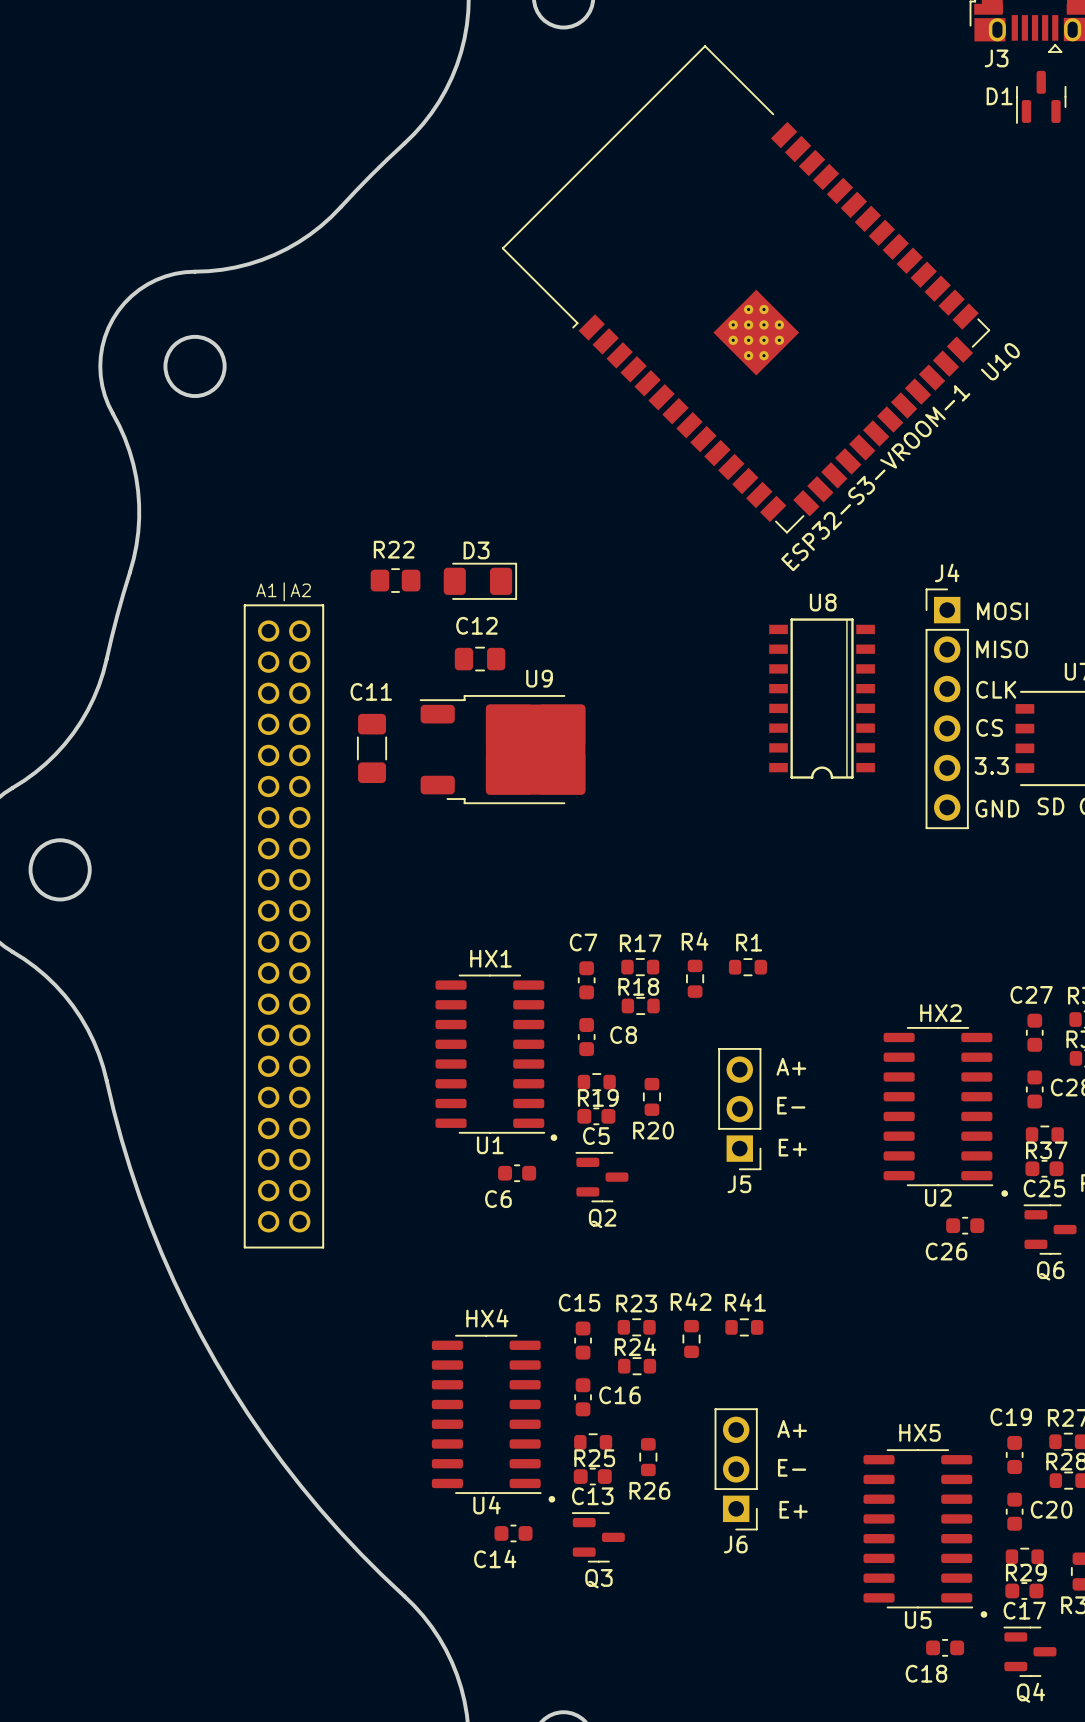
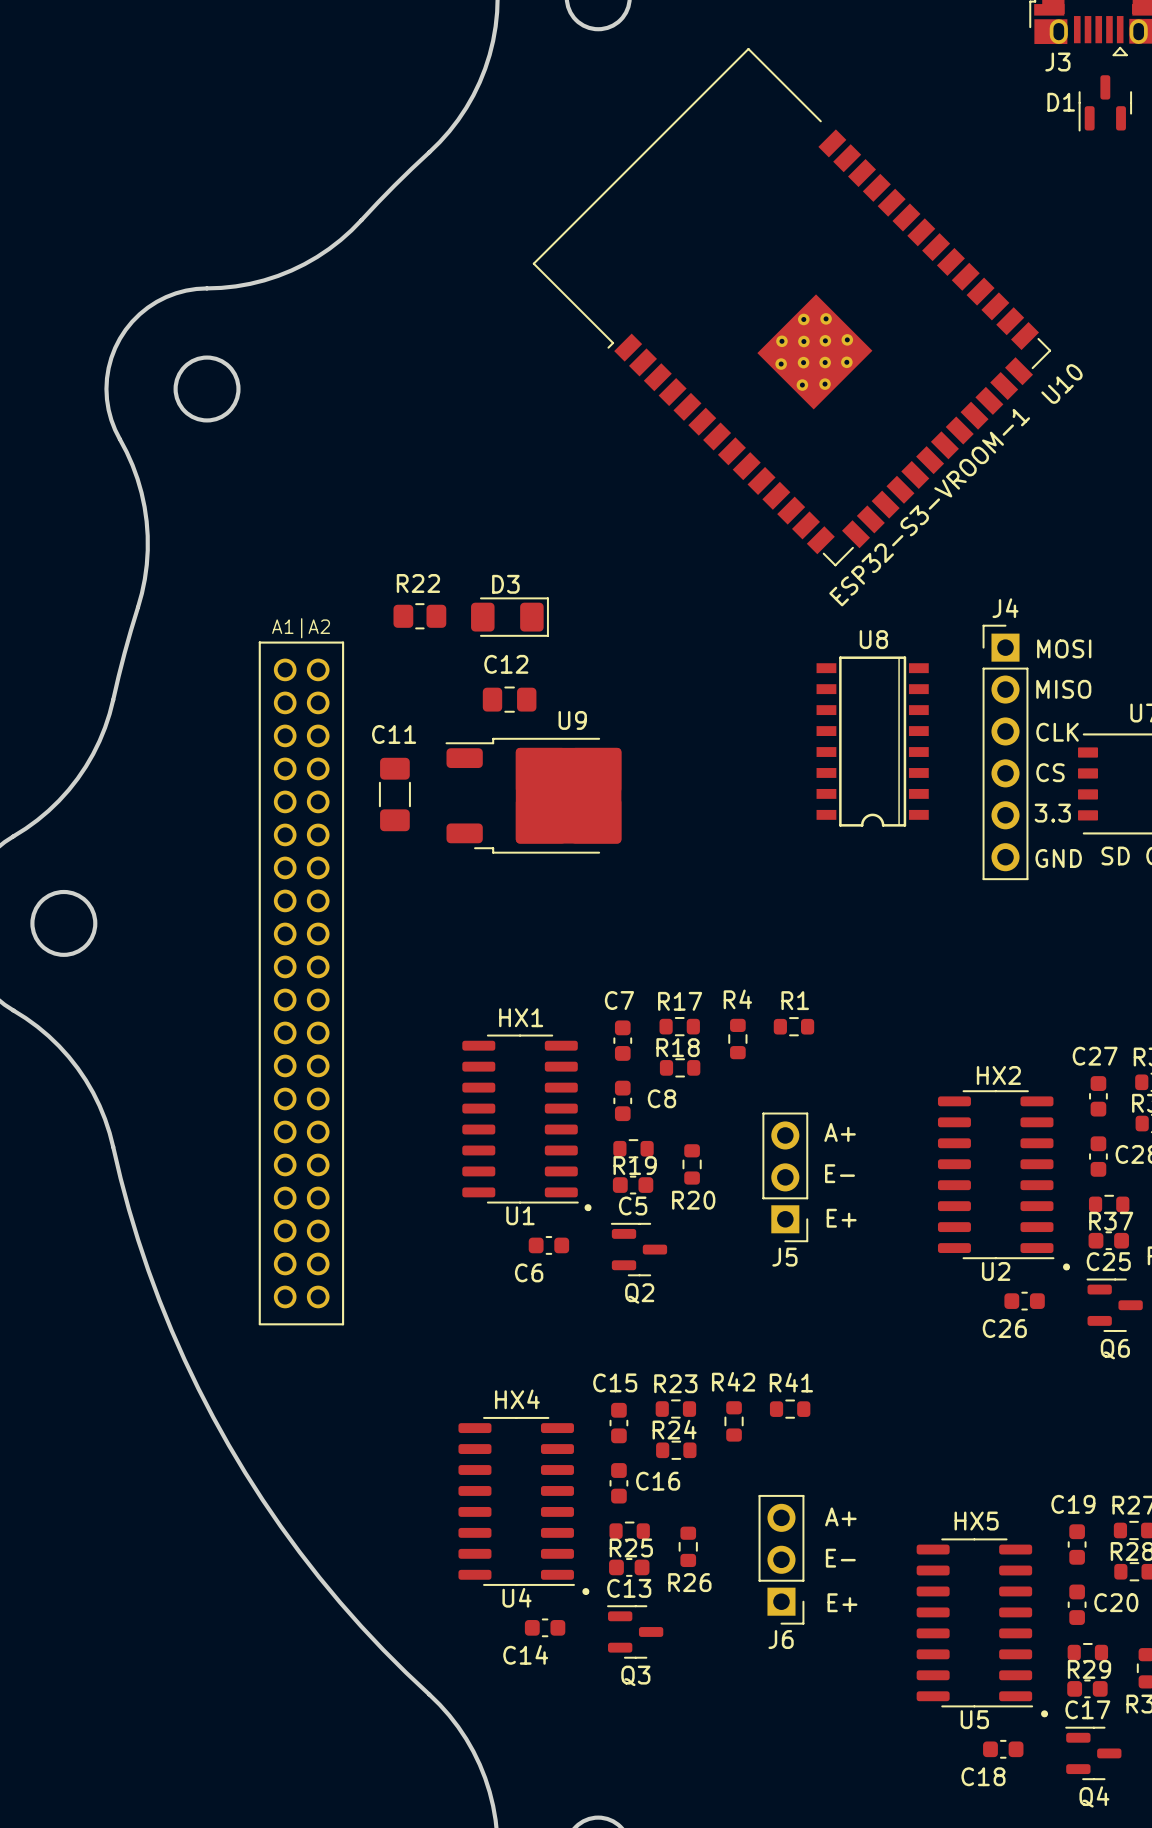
U10 footprint: [501, 45, 991, 534] -> [532, 48, 1052, 567]

